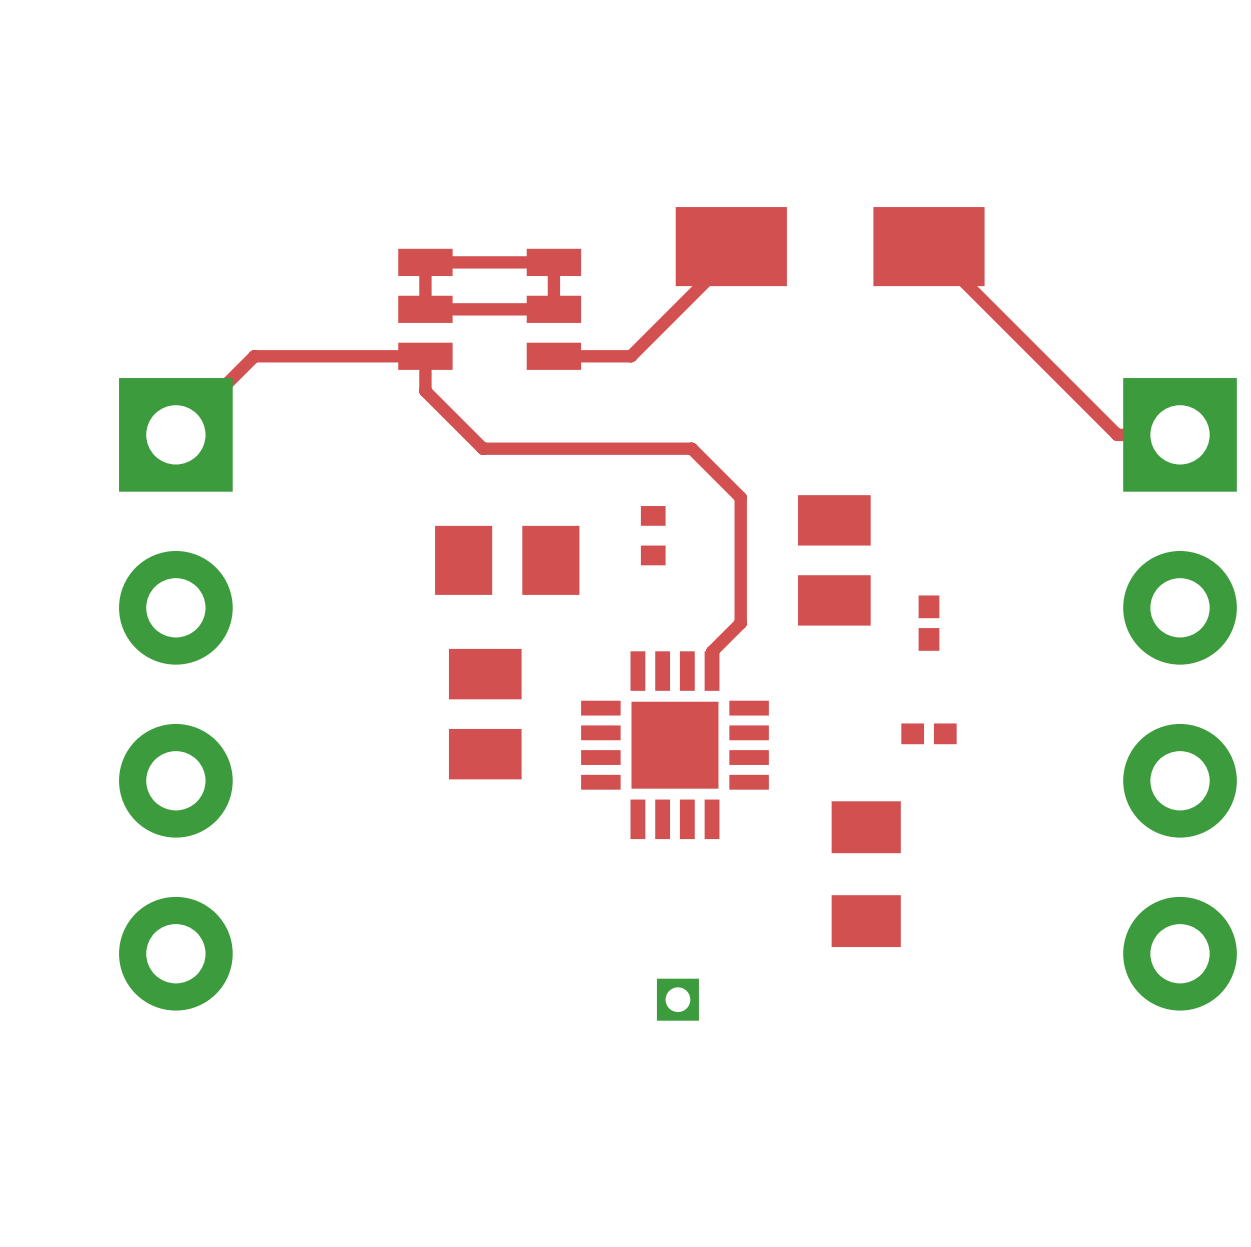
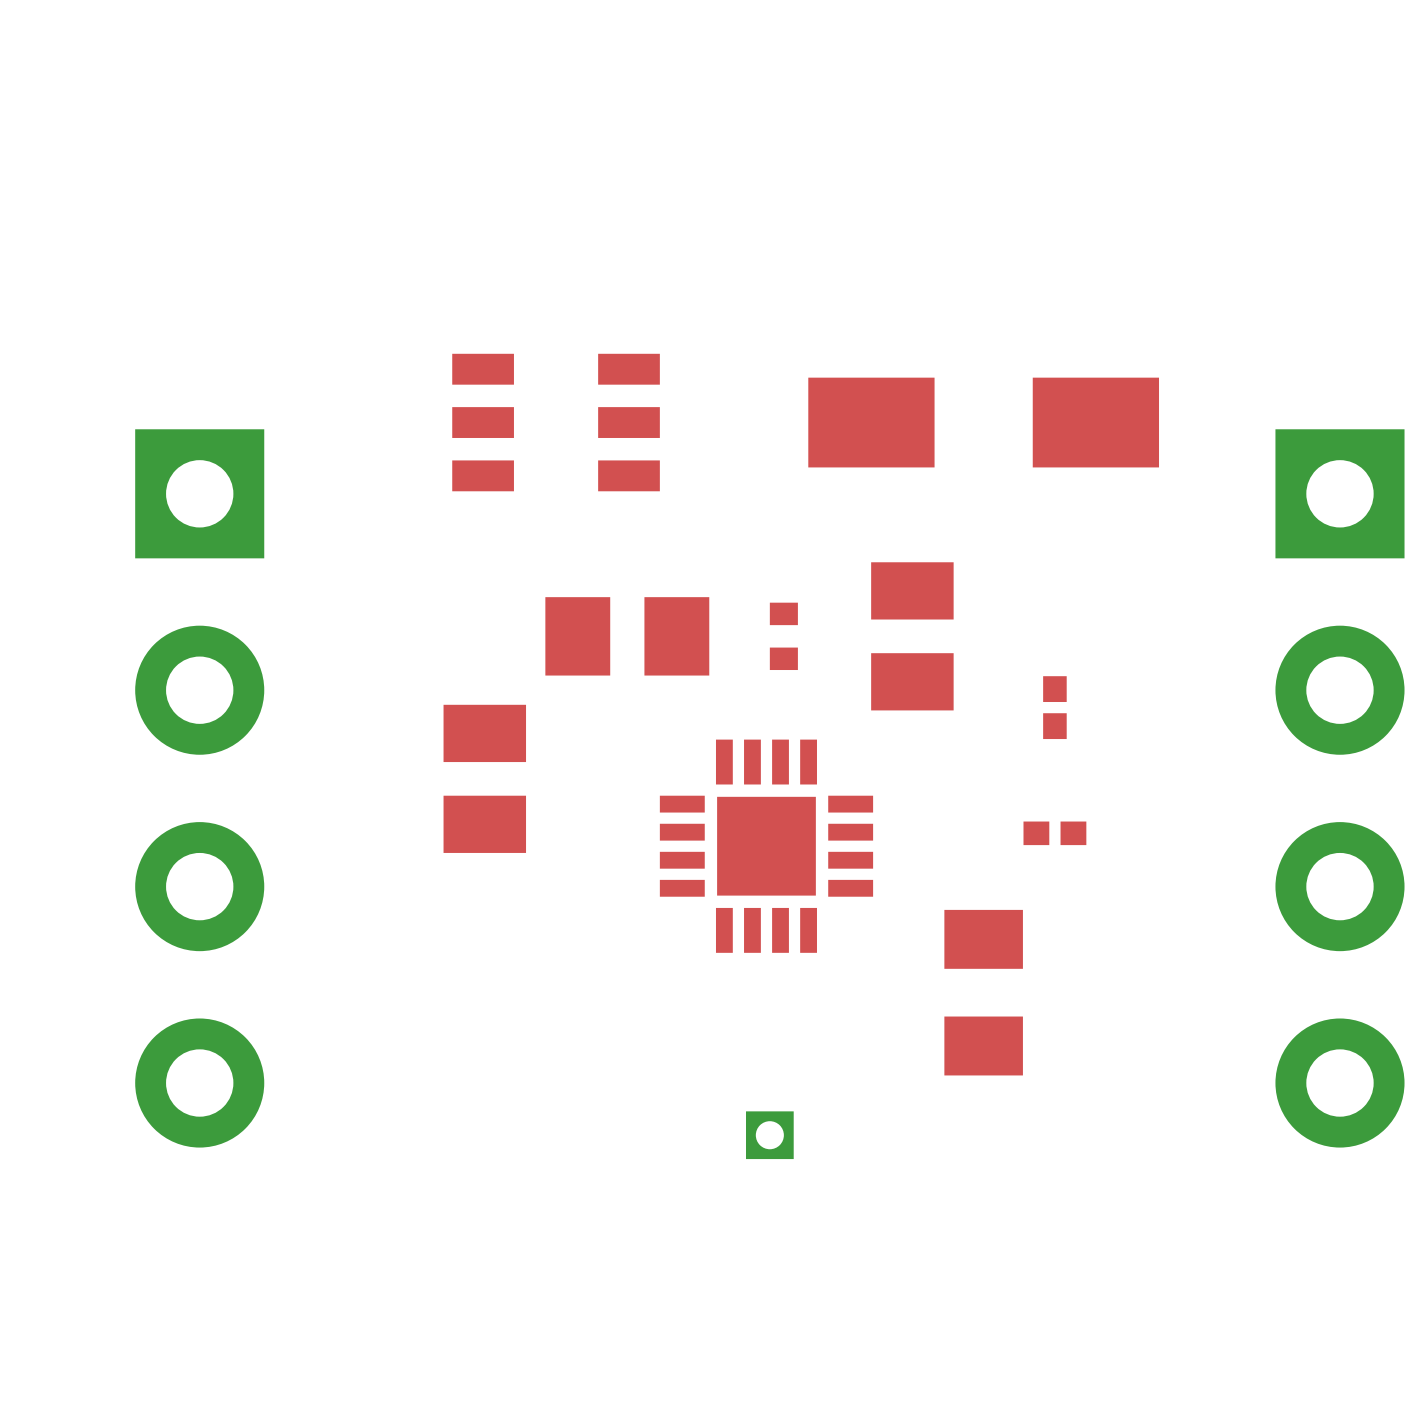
top track: (731, 246) (731, 255) (631, 356) (553, 356) -> none
part position: (830, 246) -> (983, 422)
top track: (928, 246) (1117, 434) (1180, 434) -> none
top track: (426, 309) (552, 309) (553, 262) (425, 262) (425, 309) -> none
part position: (489, 309) -> (556, 422)
top track: (175, 434) (254, 356) (425, 356) (425, 391) (483, 448) (691, 448) (740, 497) (740, 623) (712, 651) (712, 671) -> none
part position: (653, 535) -> (783, 636)
part position: (507, 560) -> (627, 636)
part position: (834, 560) -> (912, 636)
part position: (485, 714) -> (484, 778)

